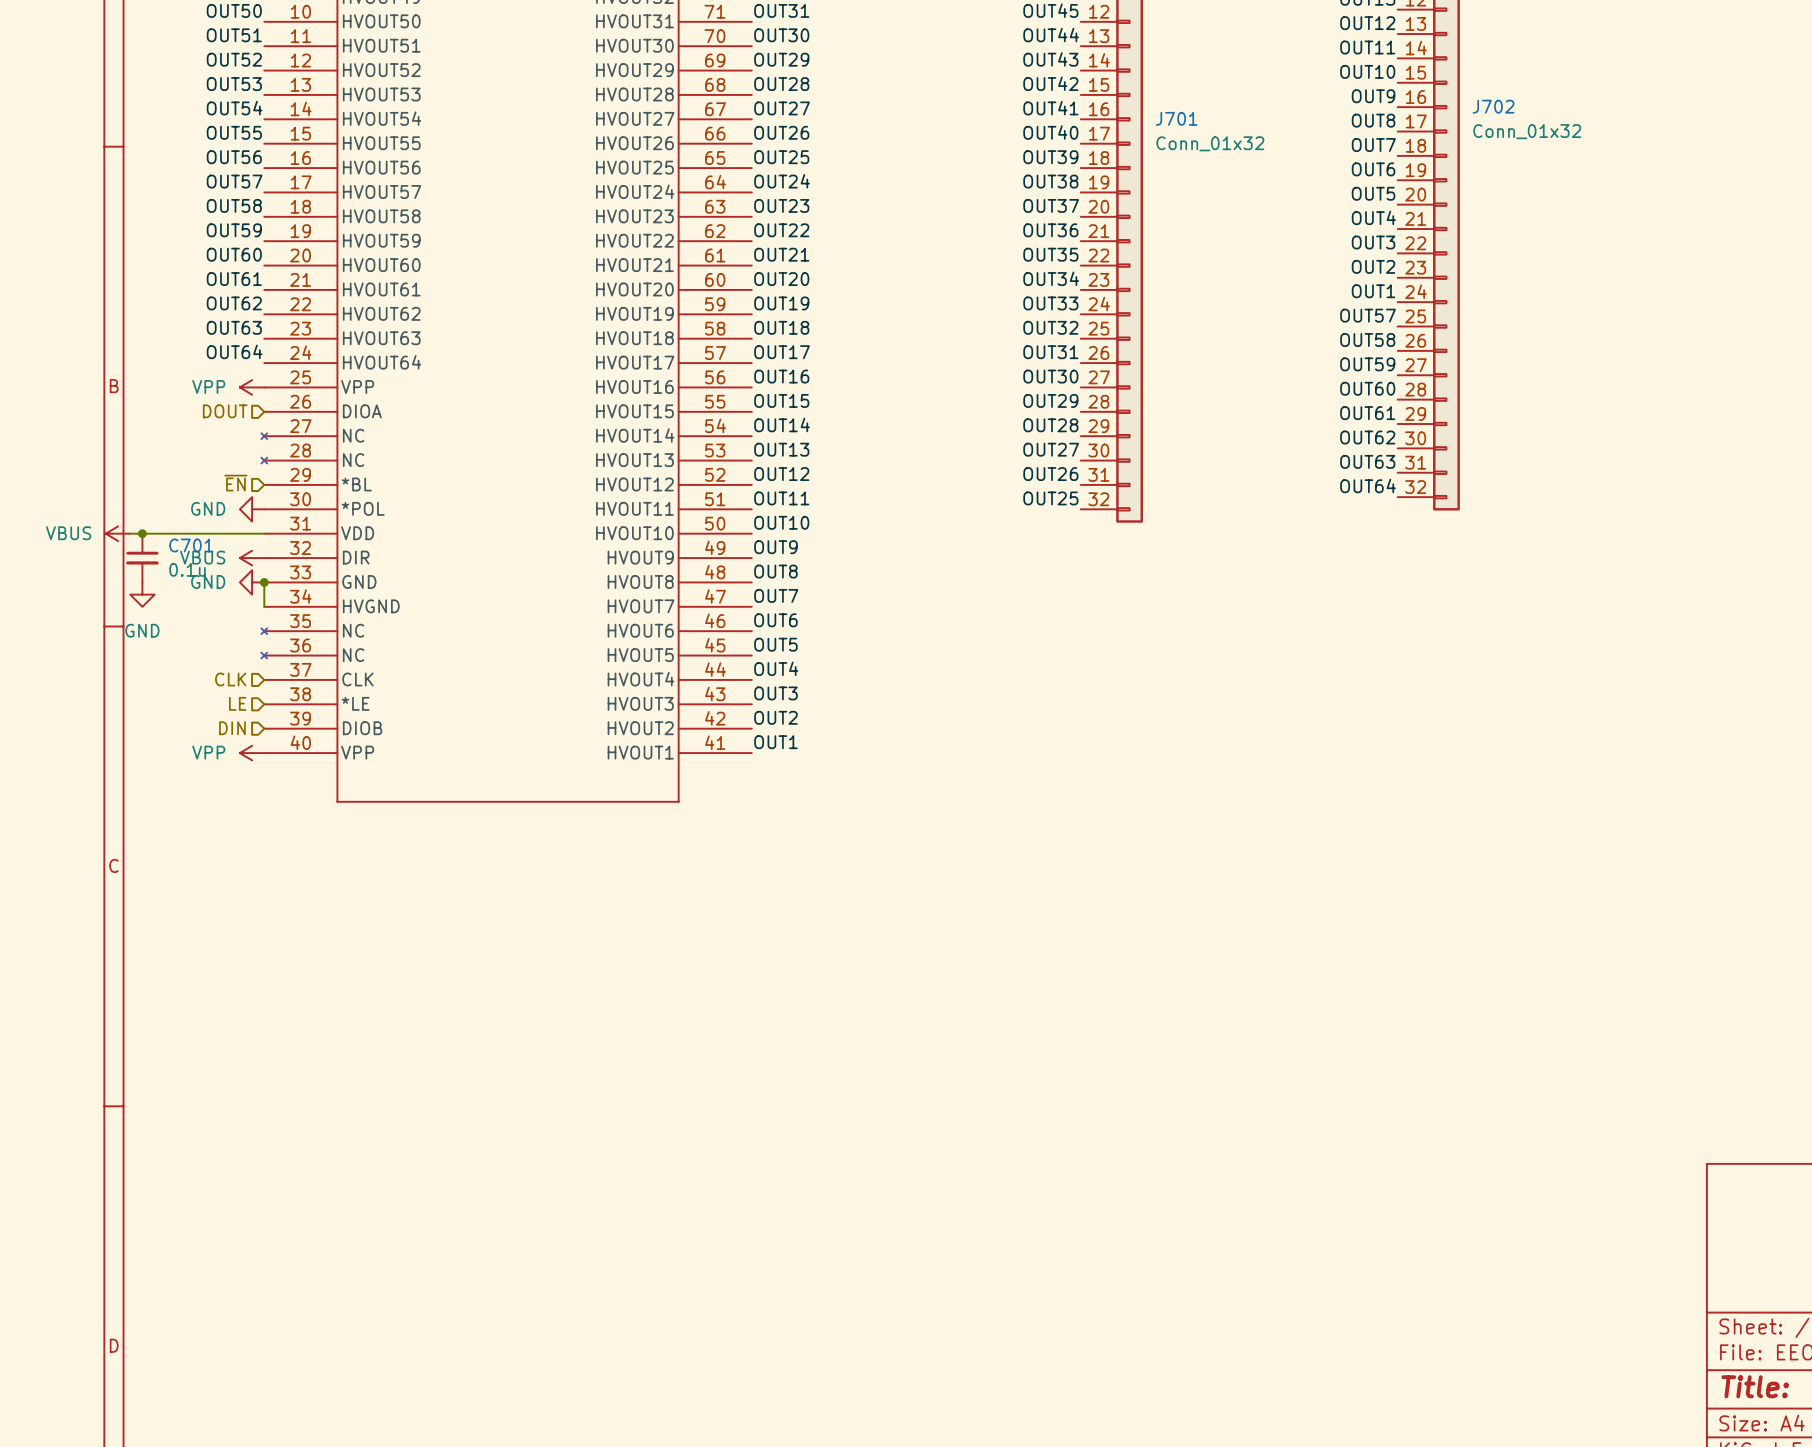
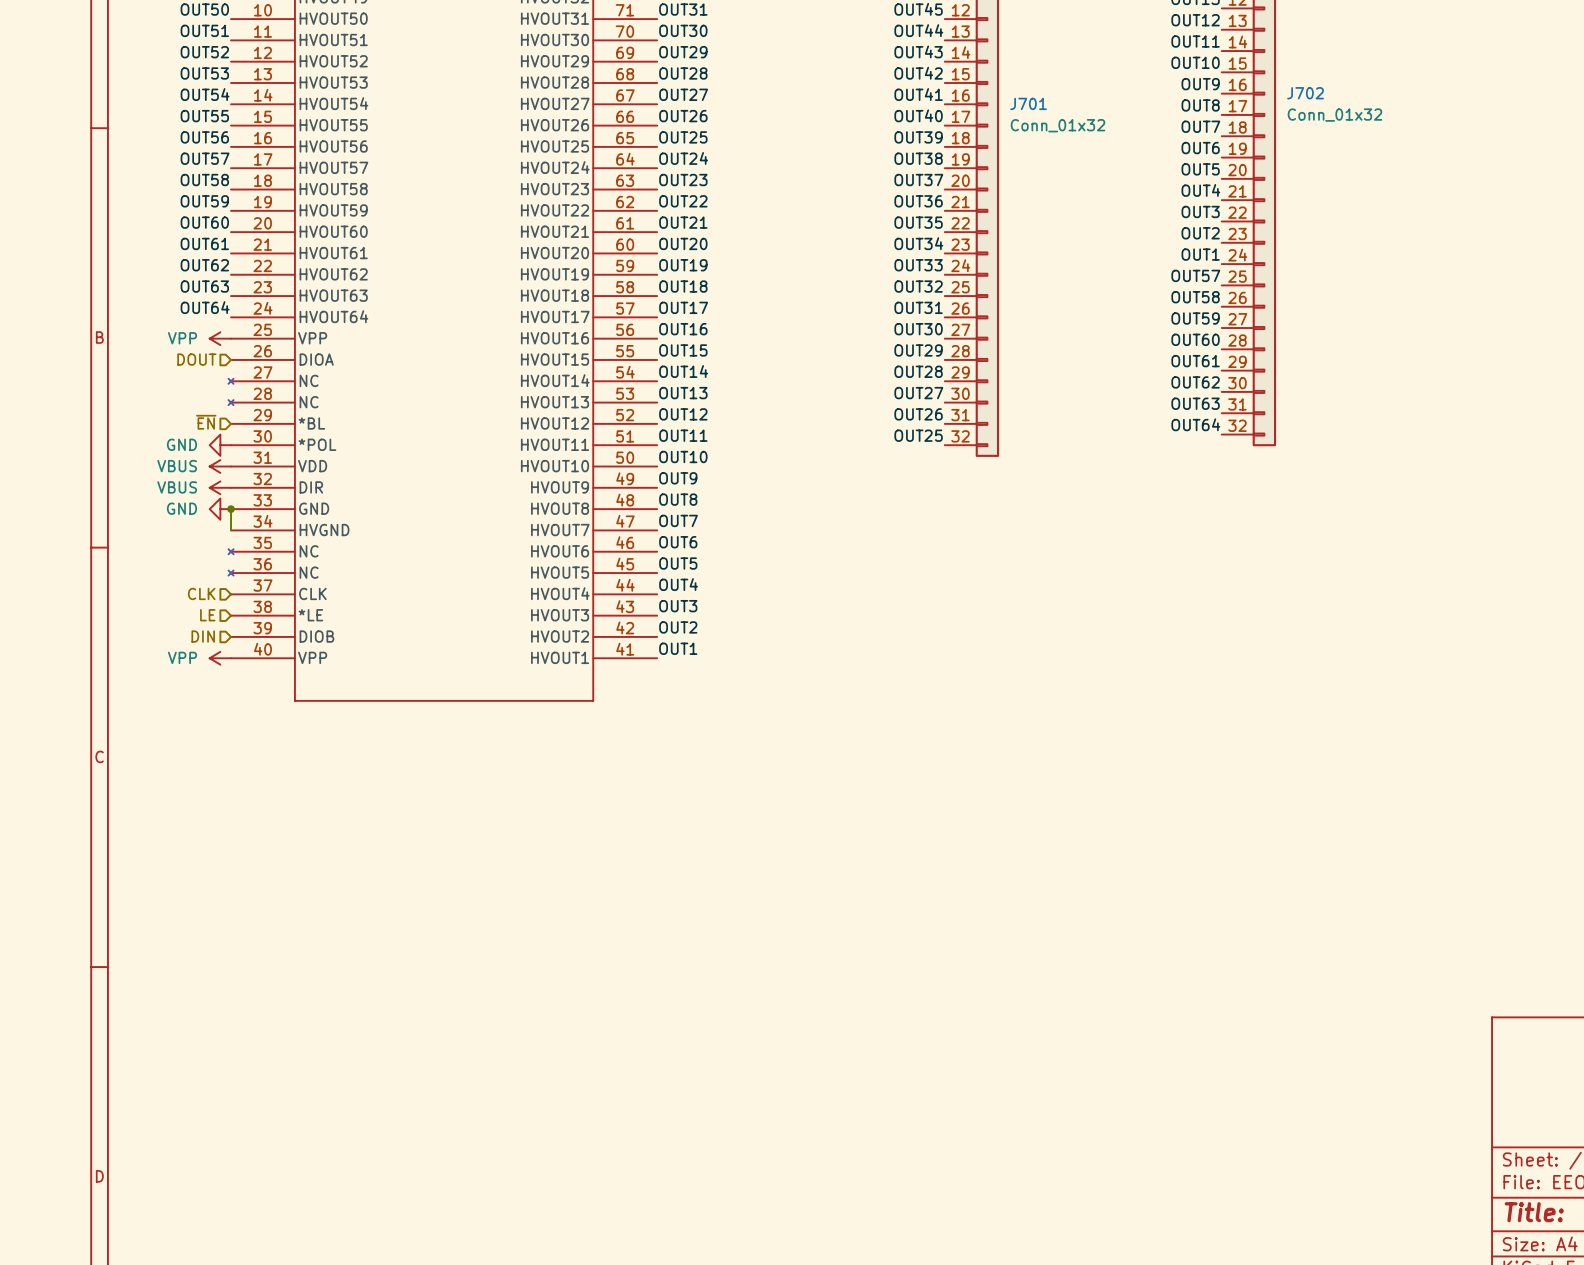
power symbol position: VBUS (118, 533) -> VBUS (220, 466)
wire: (130, 533) (264, 533) -> none
junction: (142, 533) -> none
C701: 0.1u (142, 558) -> none
power symbol: GND (142, 594) -> none

